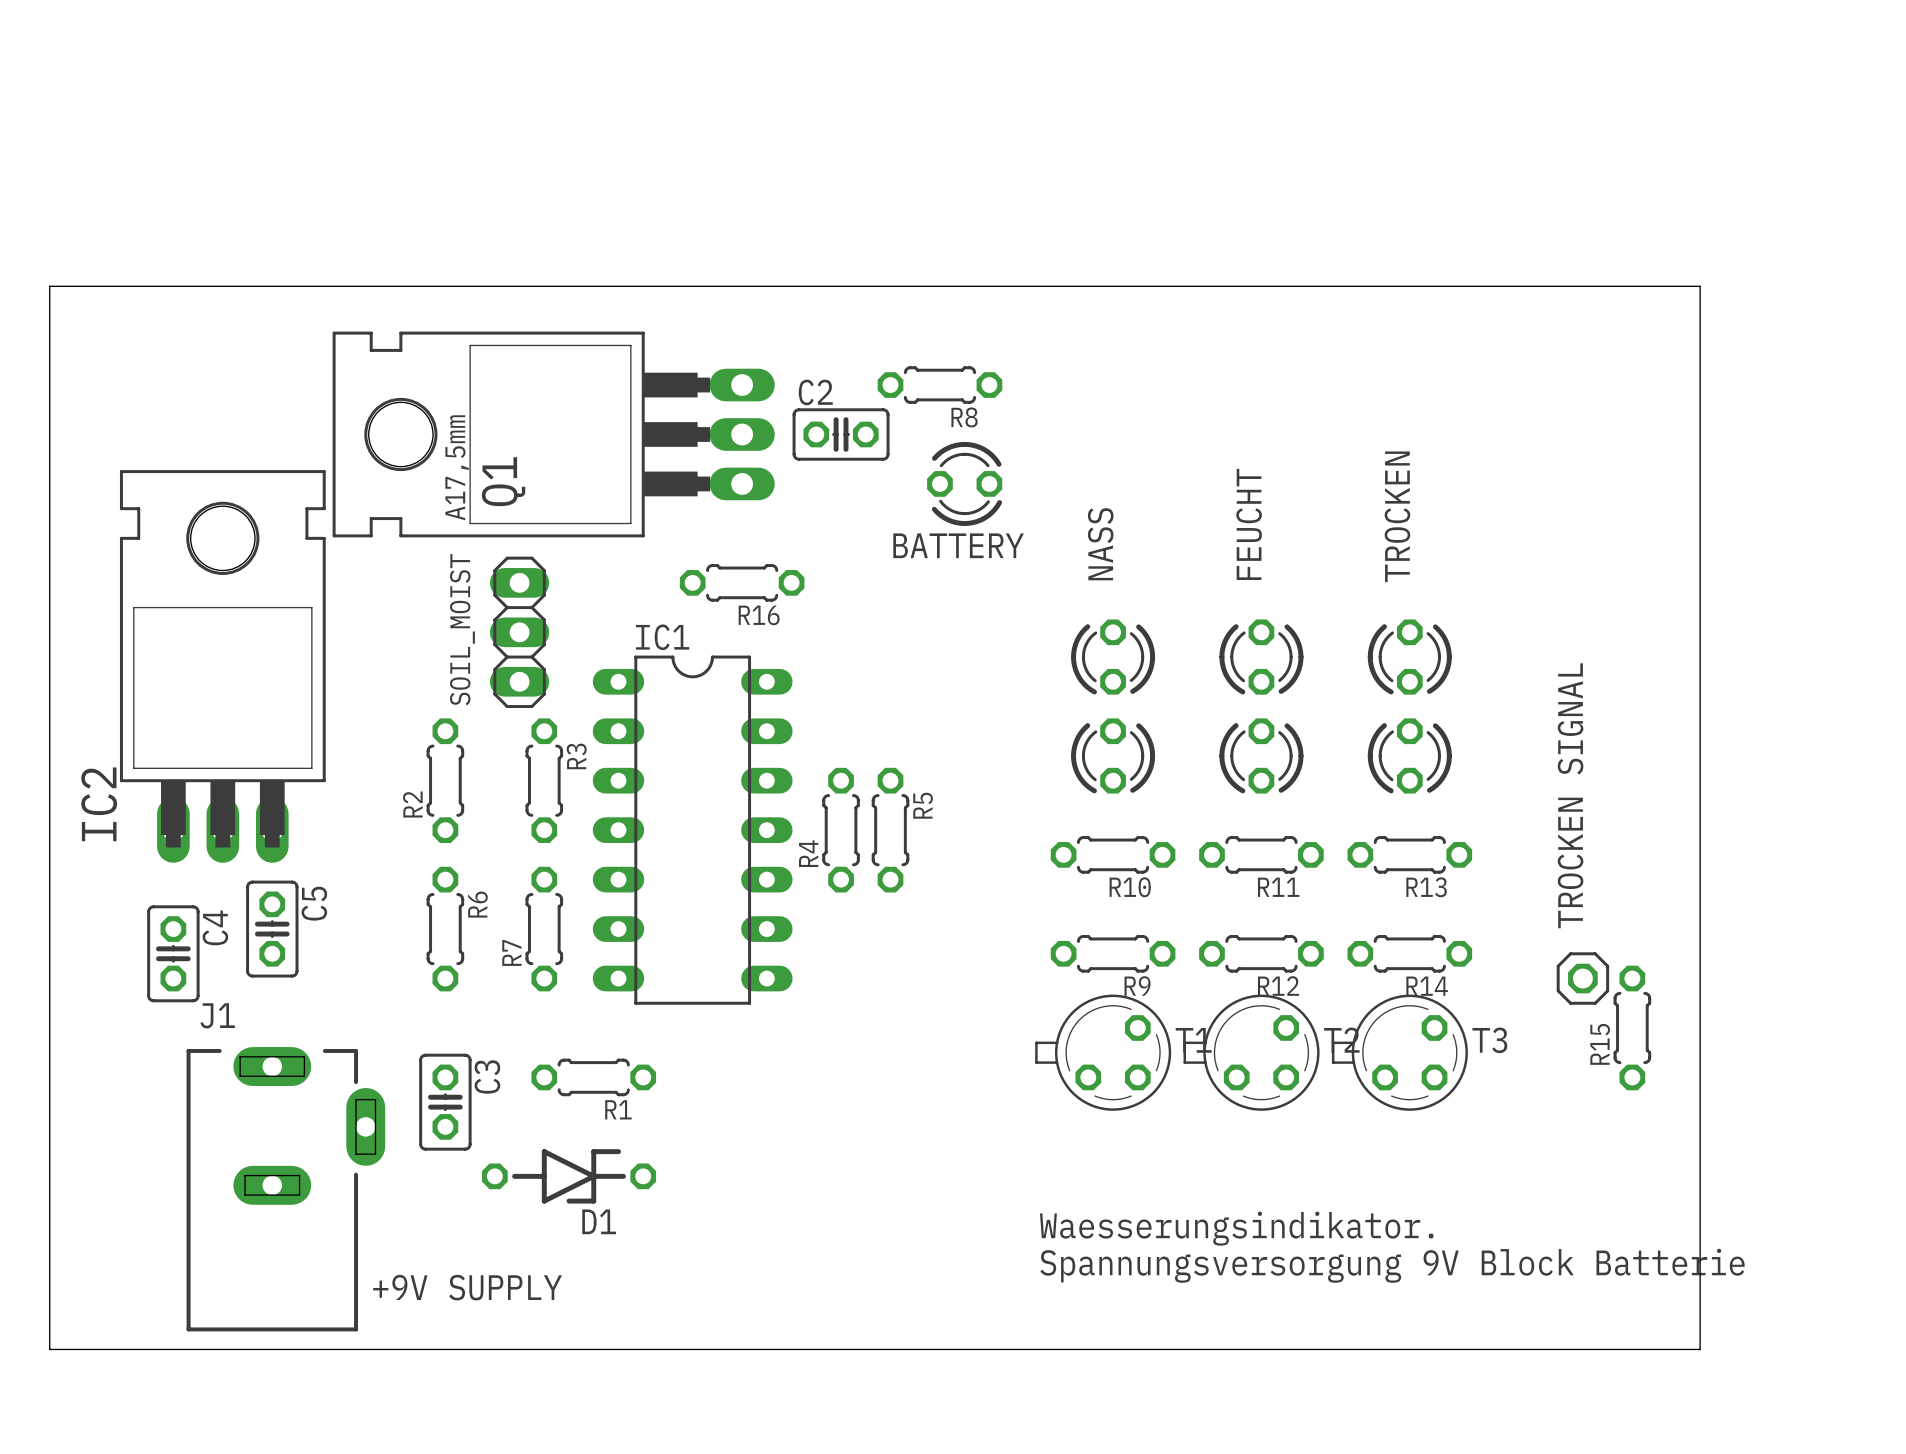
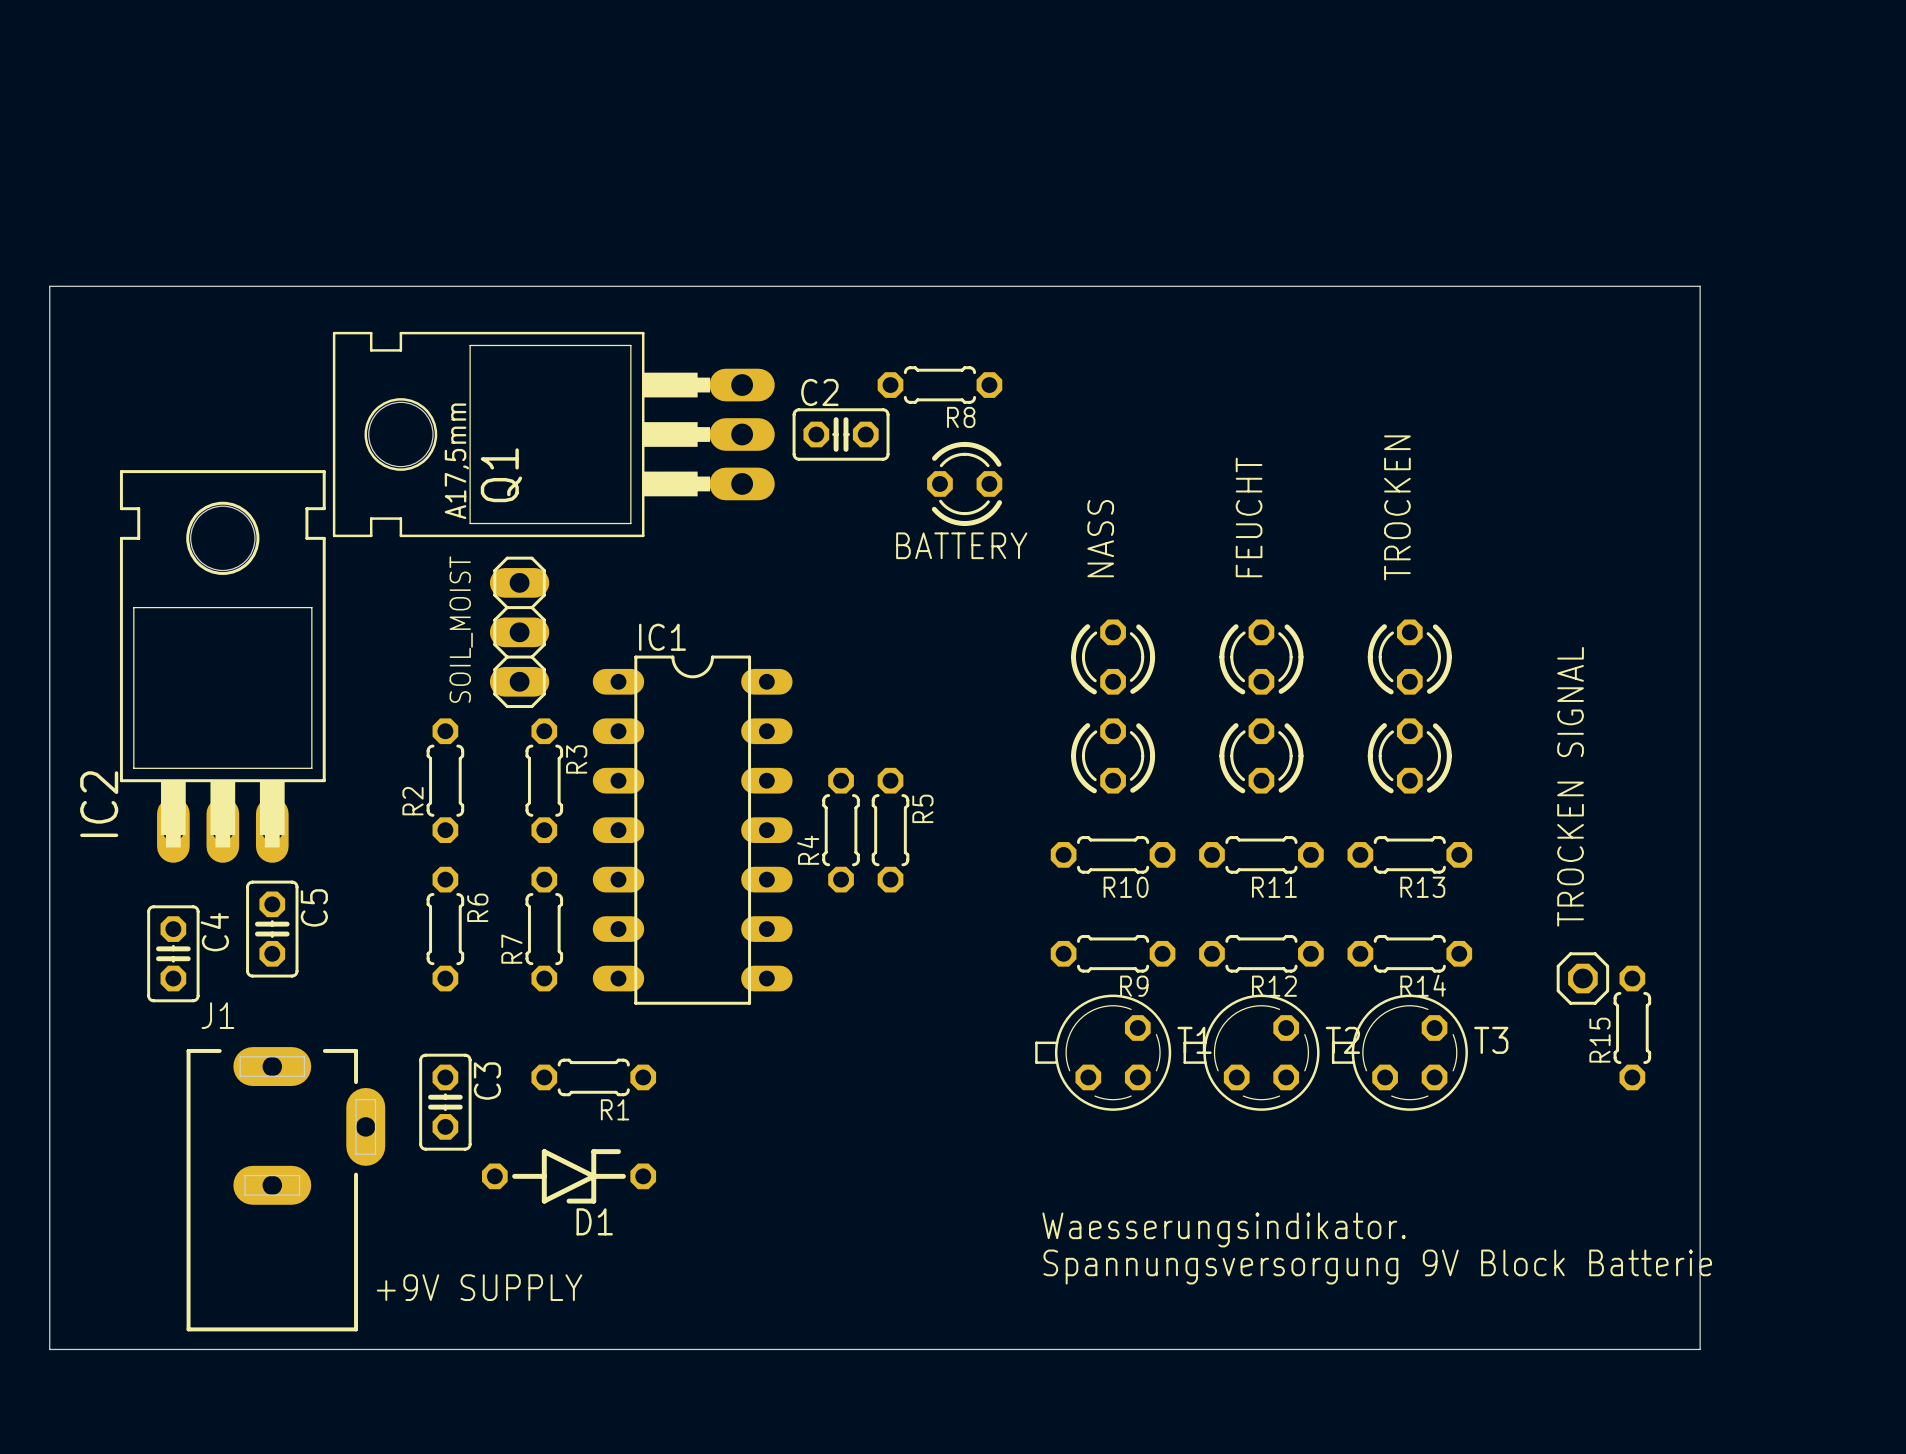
Q1 footprint: [332, 331, 775, 538] -> [332, 331, 775, 538]
R16: (742, 582) -> none

